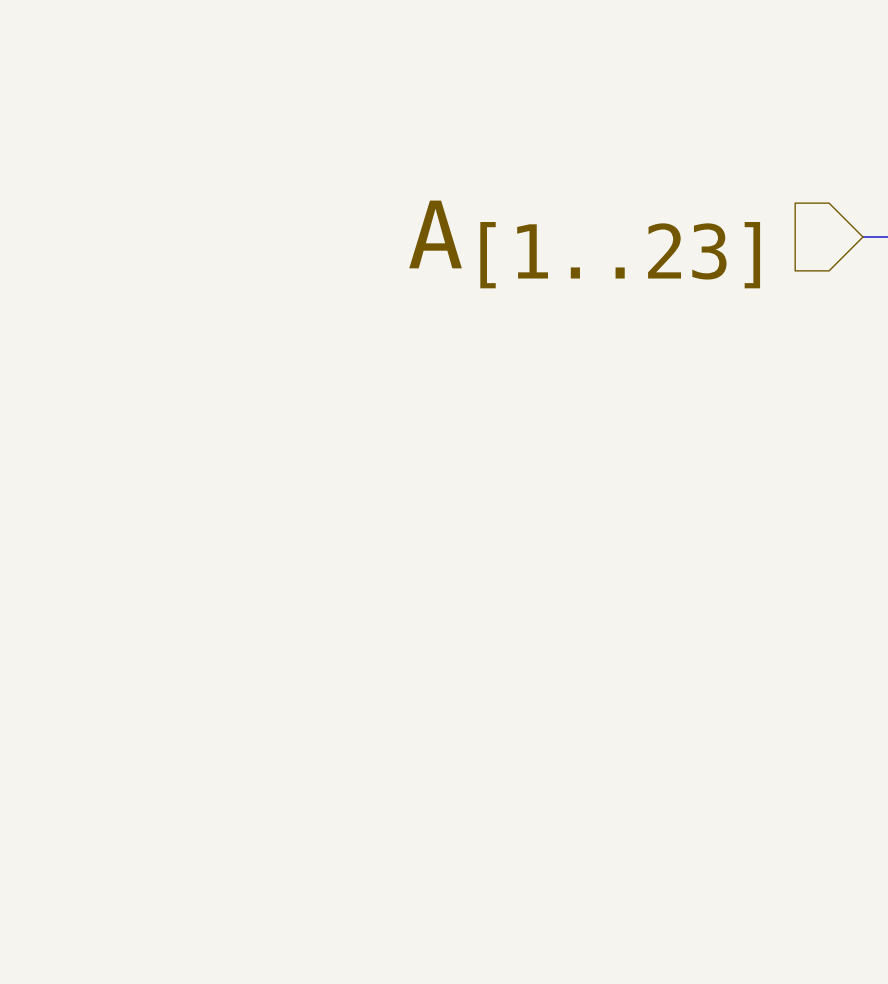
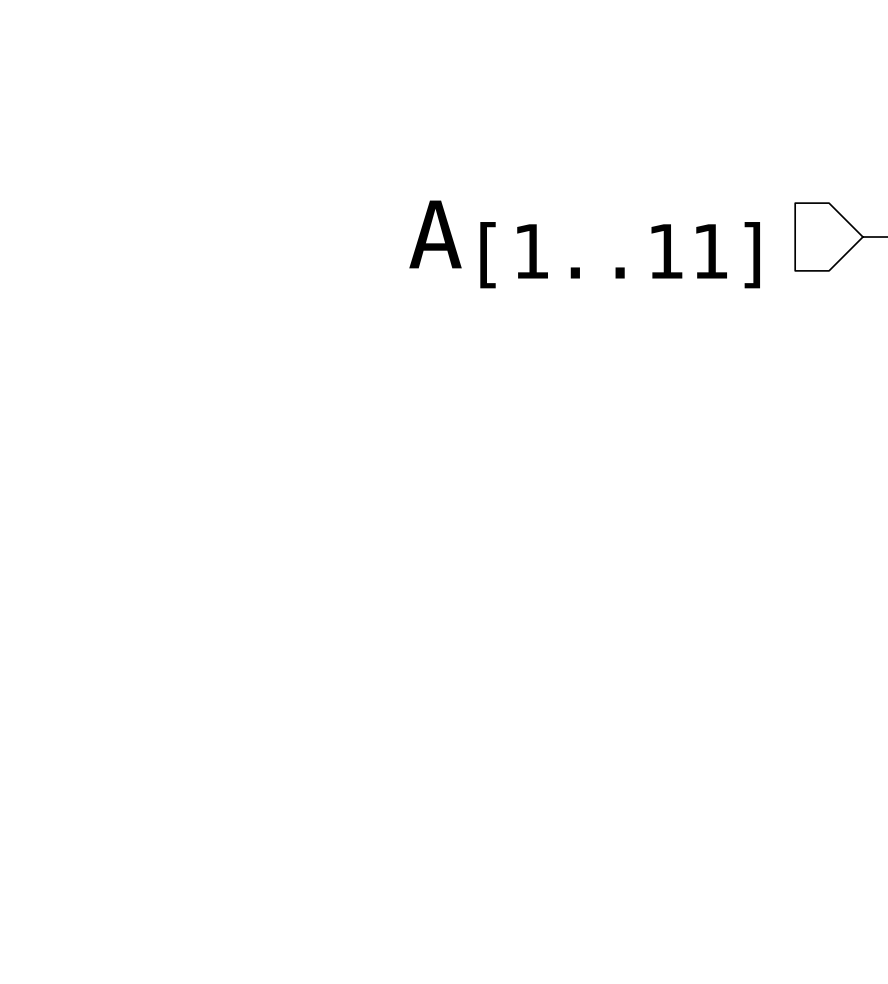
hierarchical label: A[1..23] (584, 244) -> A[1..11] (584, 244)

